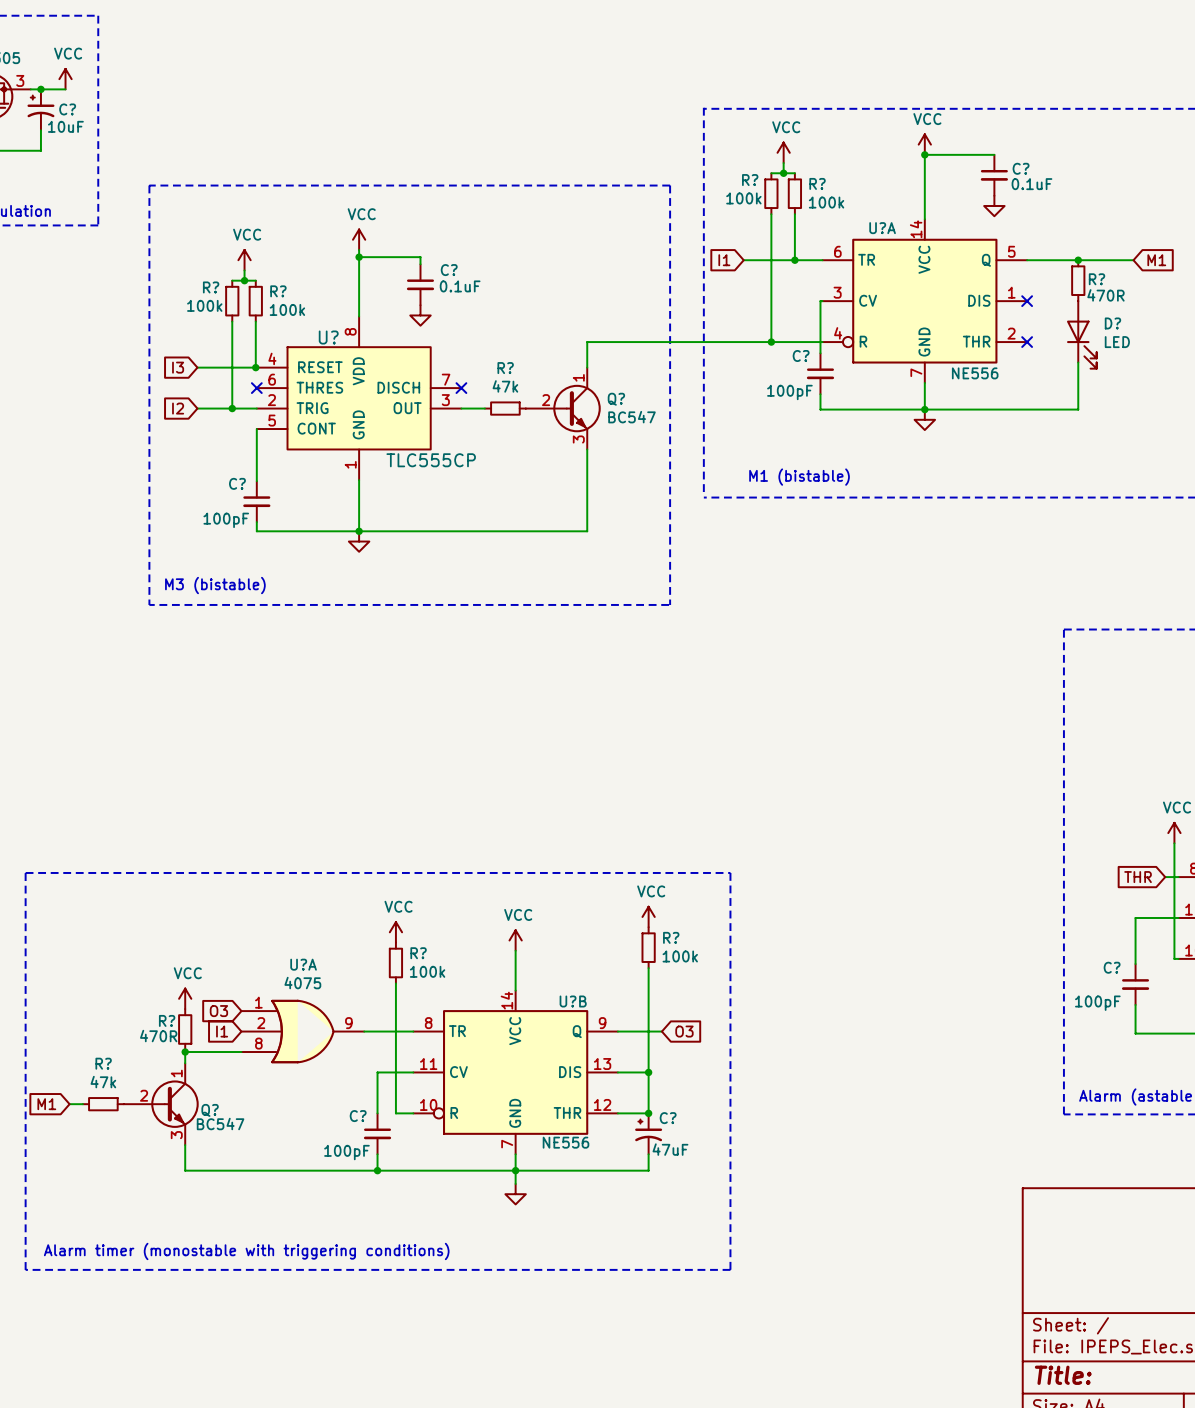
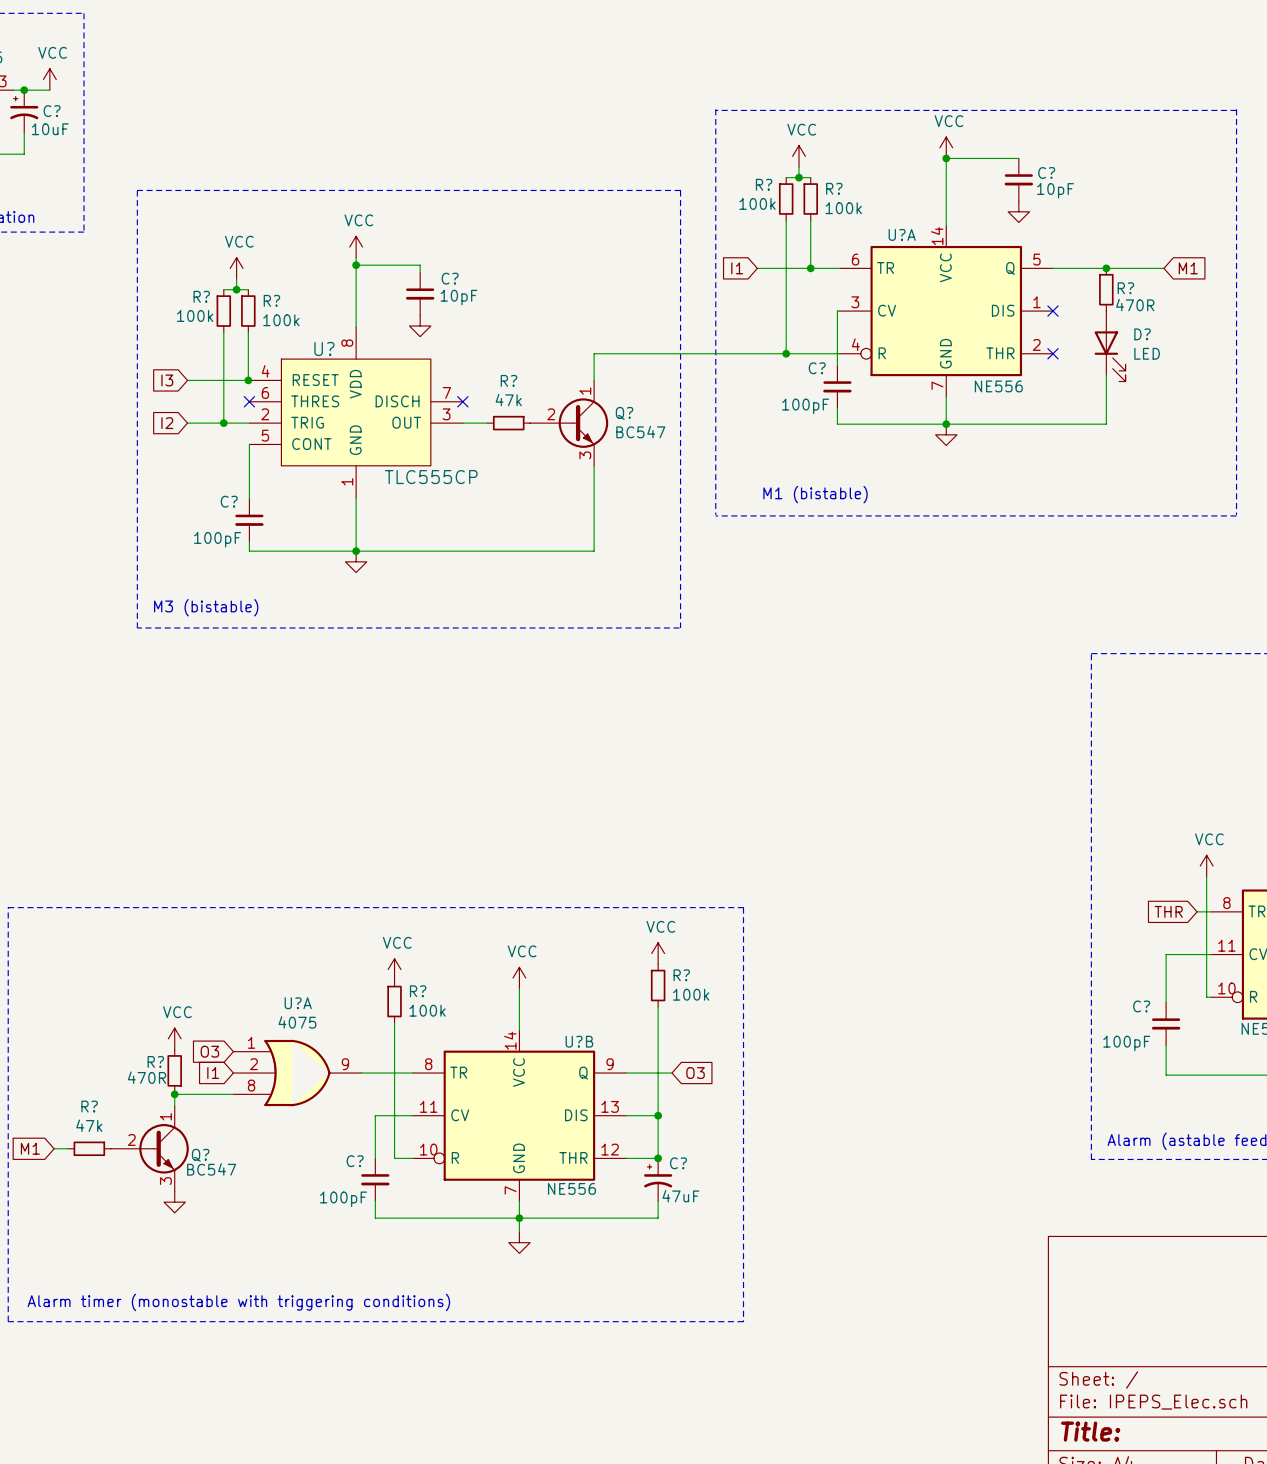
C? value: 0.1uF (1031, 184) -> 10pF (1055, 190)
C? value: 0.1uF (460, 286) -> 10pF (458, 297)
wire: (185, 1145) (185, 1170) (377, 1170) -> none
power symbol: none -> (174, 1202)
junction: (377, 1170) -> none

